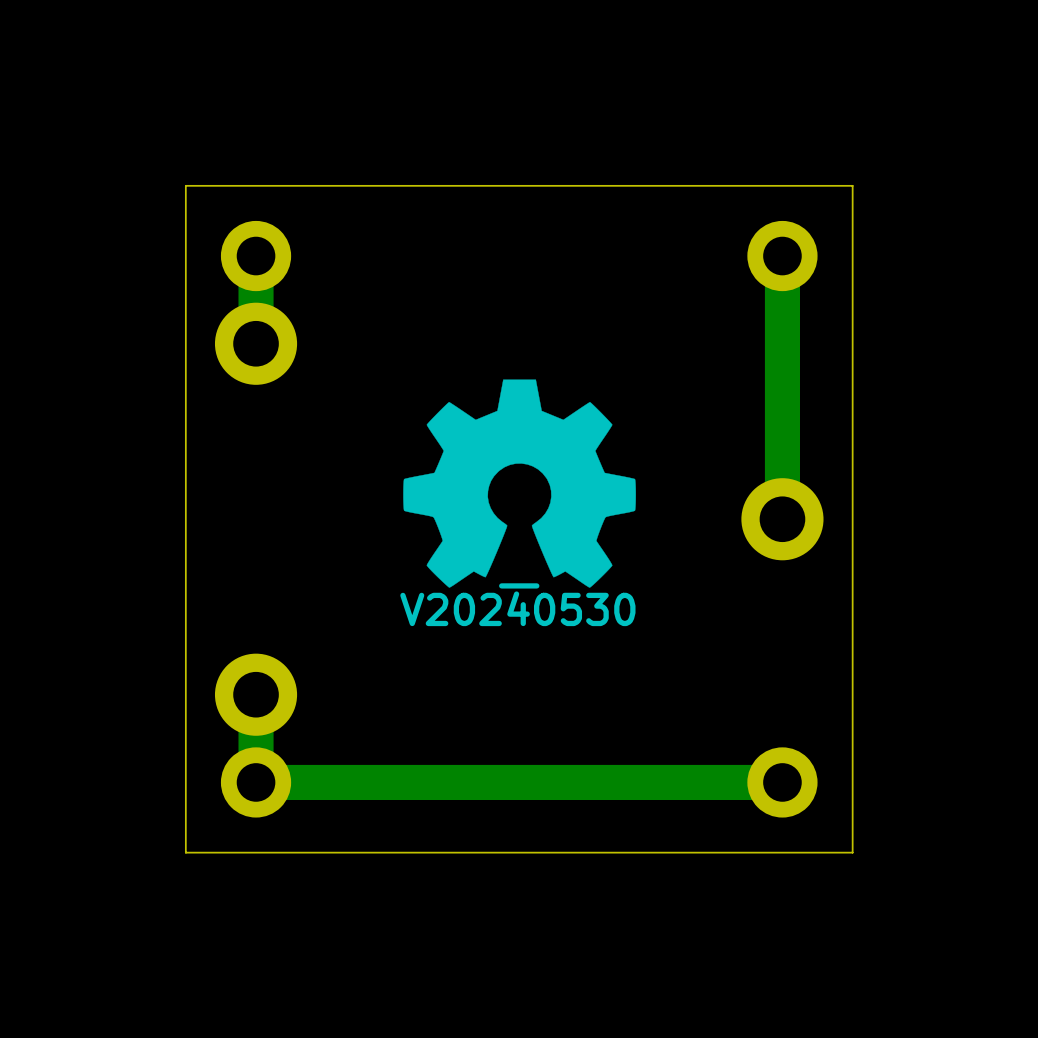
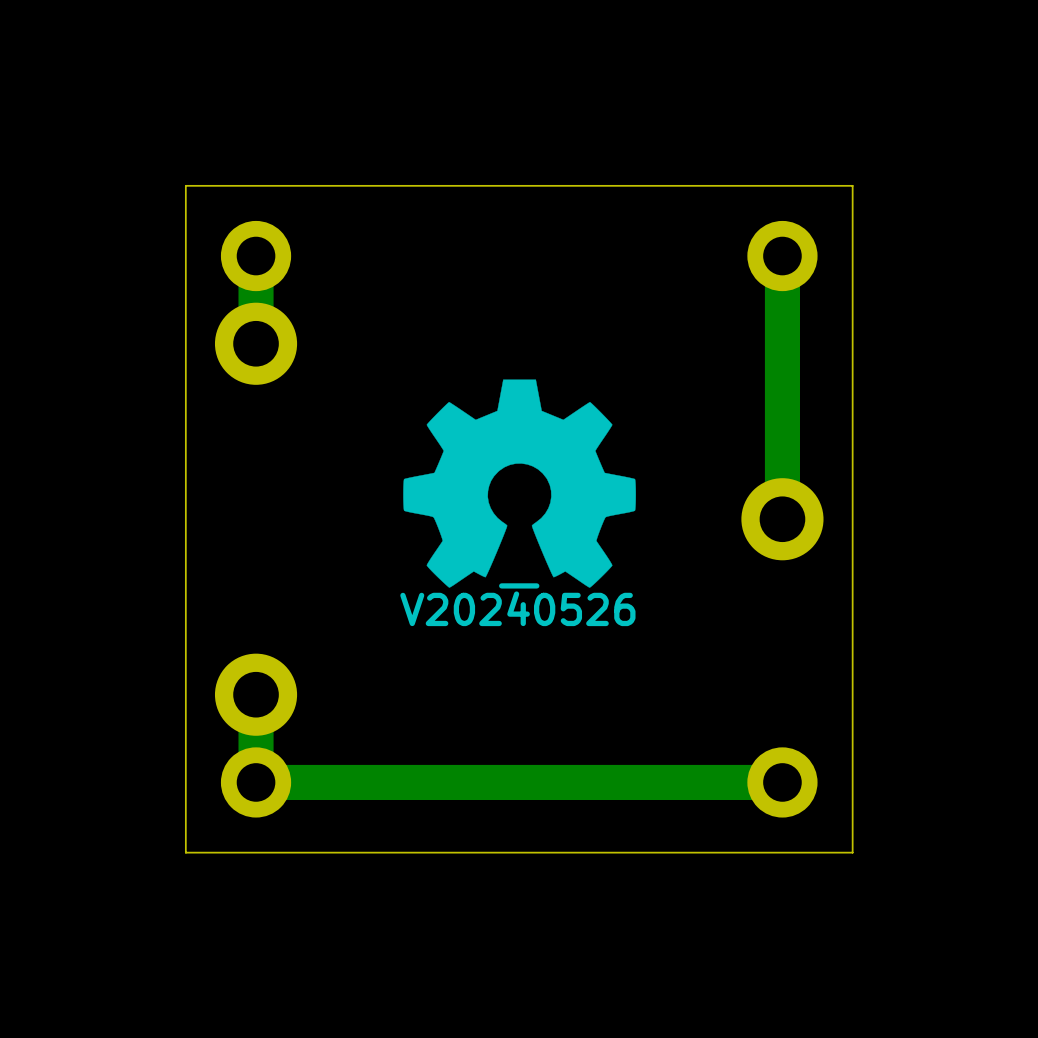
drawing shape: [400, 583, 636, 627] -> [400, 583, 636, 627]

